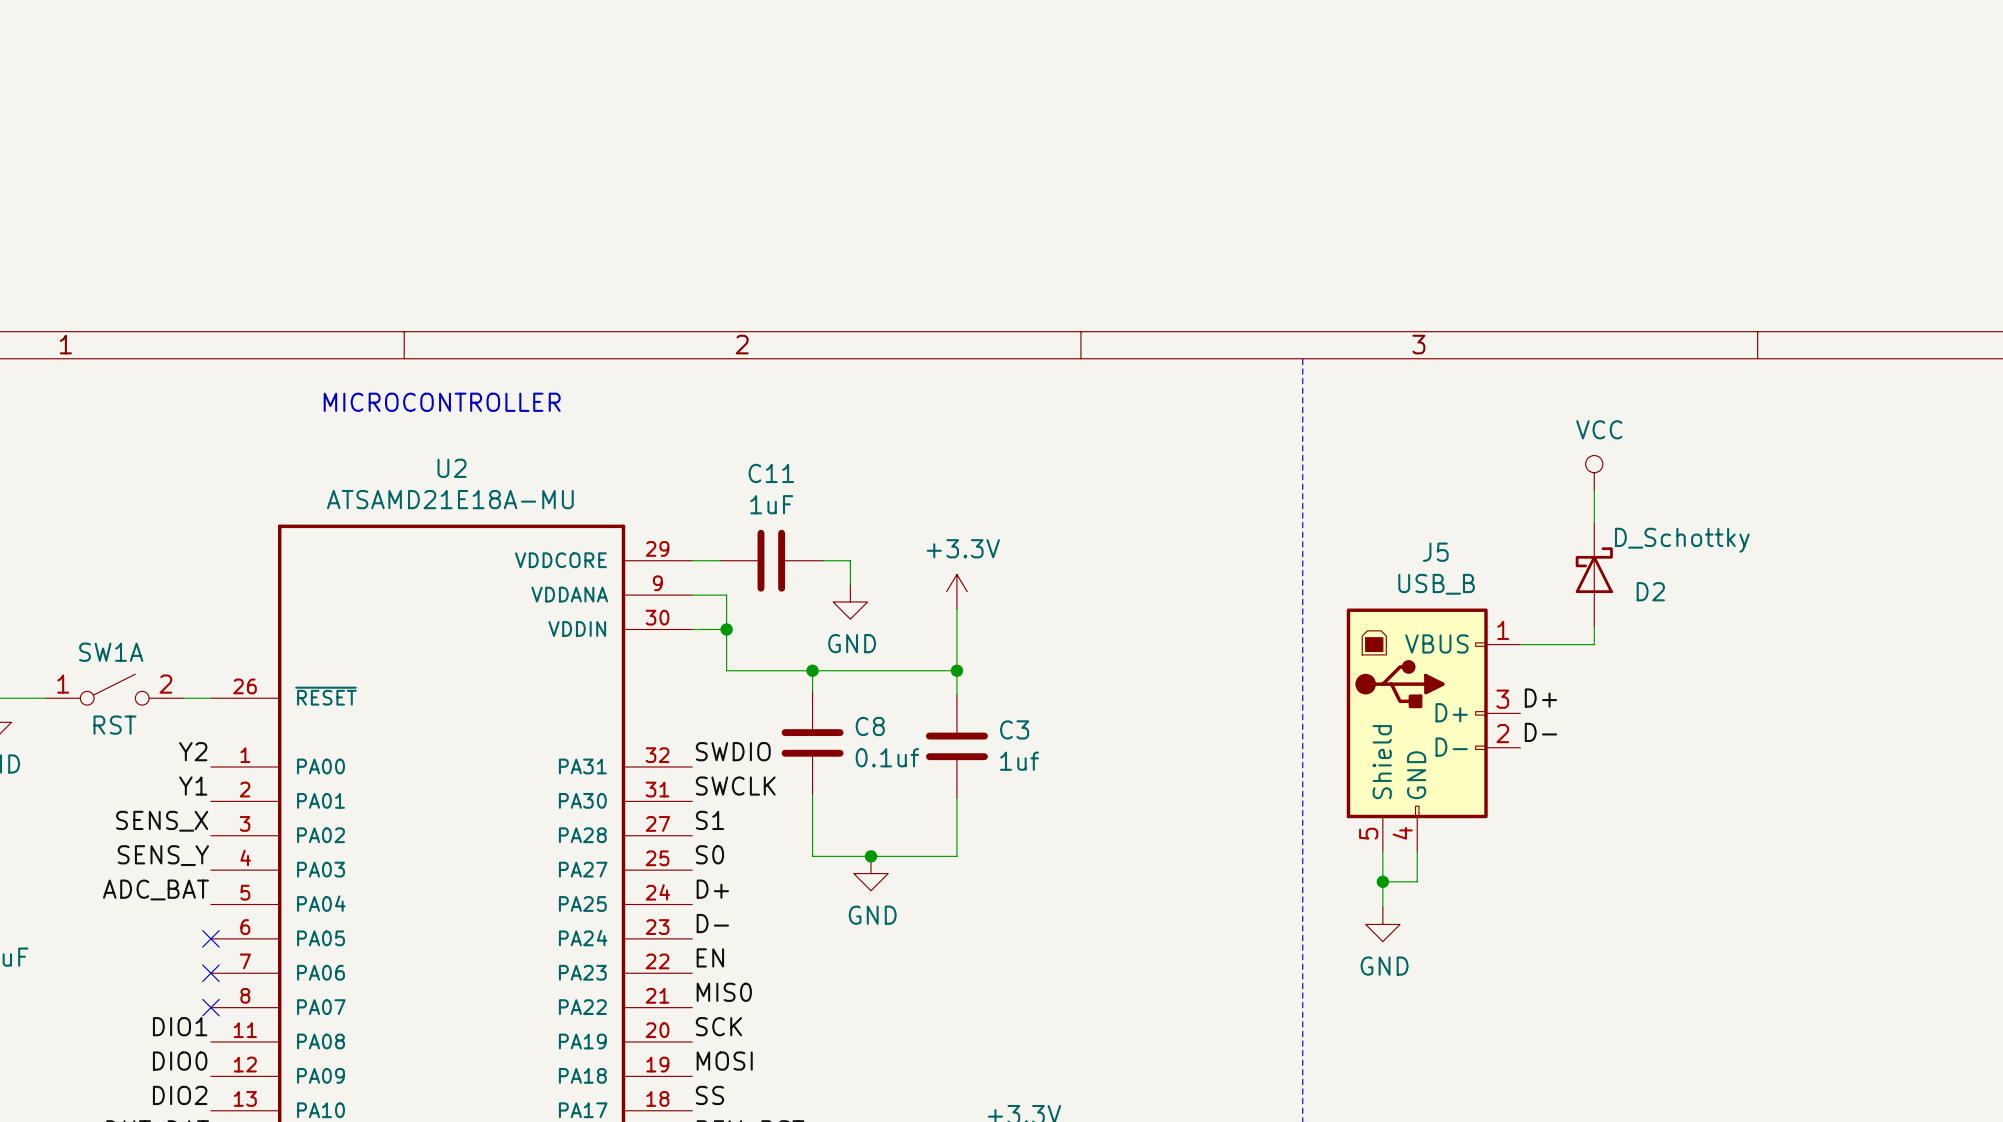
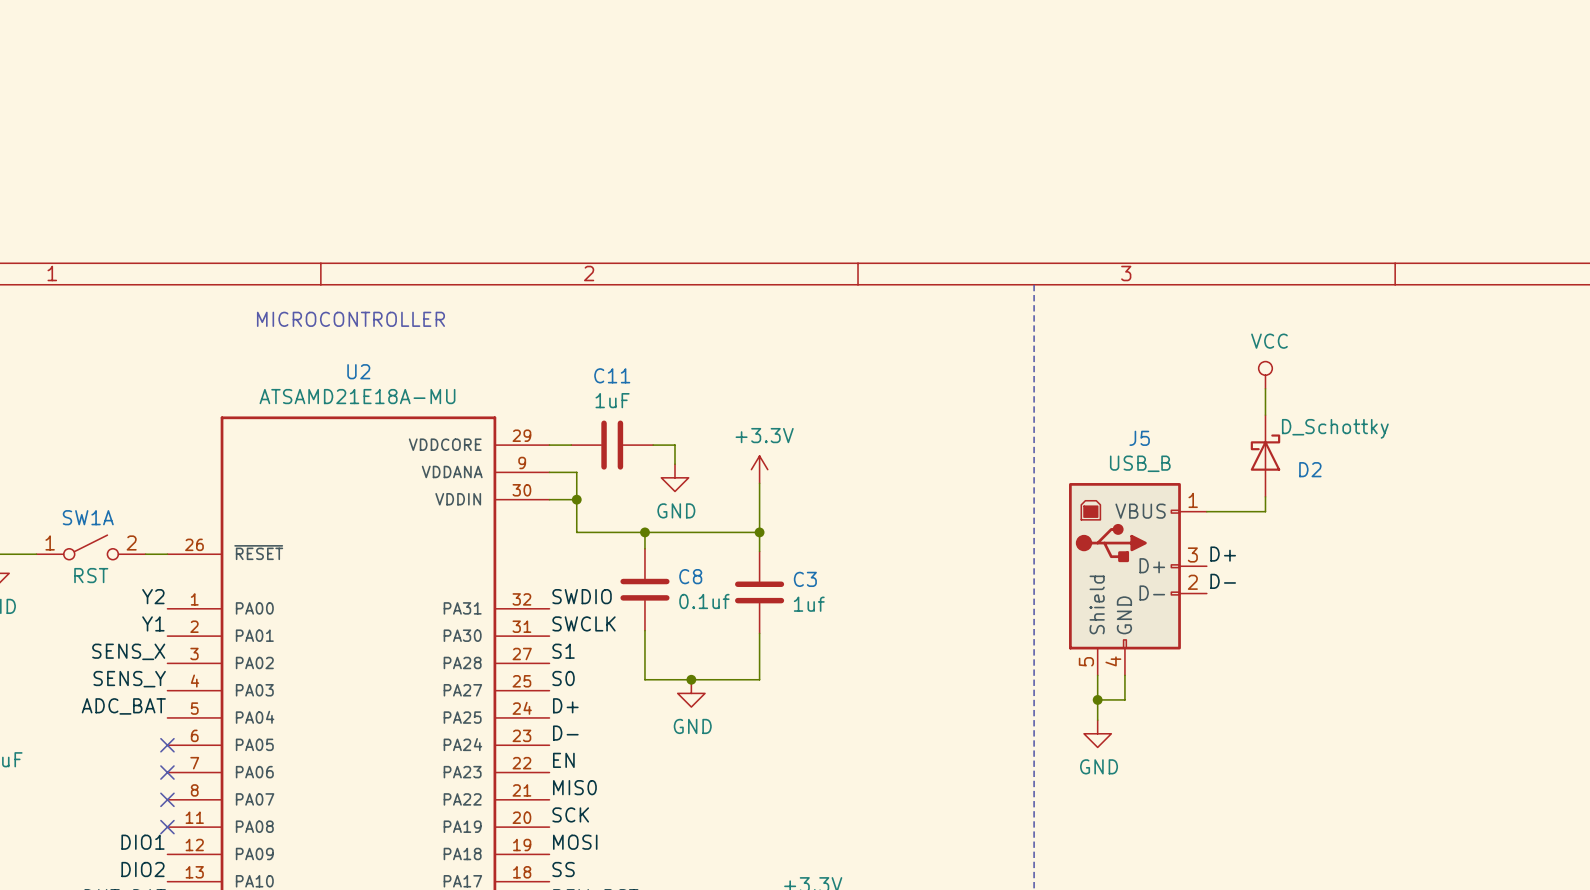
label: DIO1 (180, 1026) -> none
no-connect mark: none -> (167, 827)
label: DIO0 (180, 1061) -> DIO1 (142, 842)

